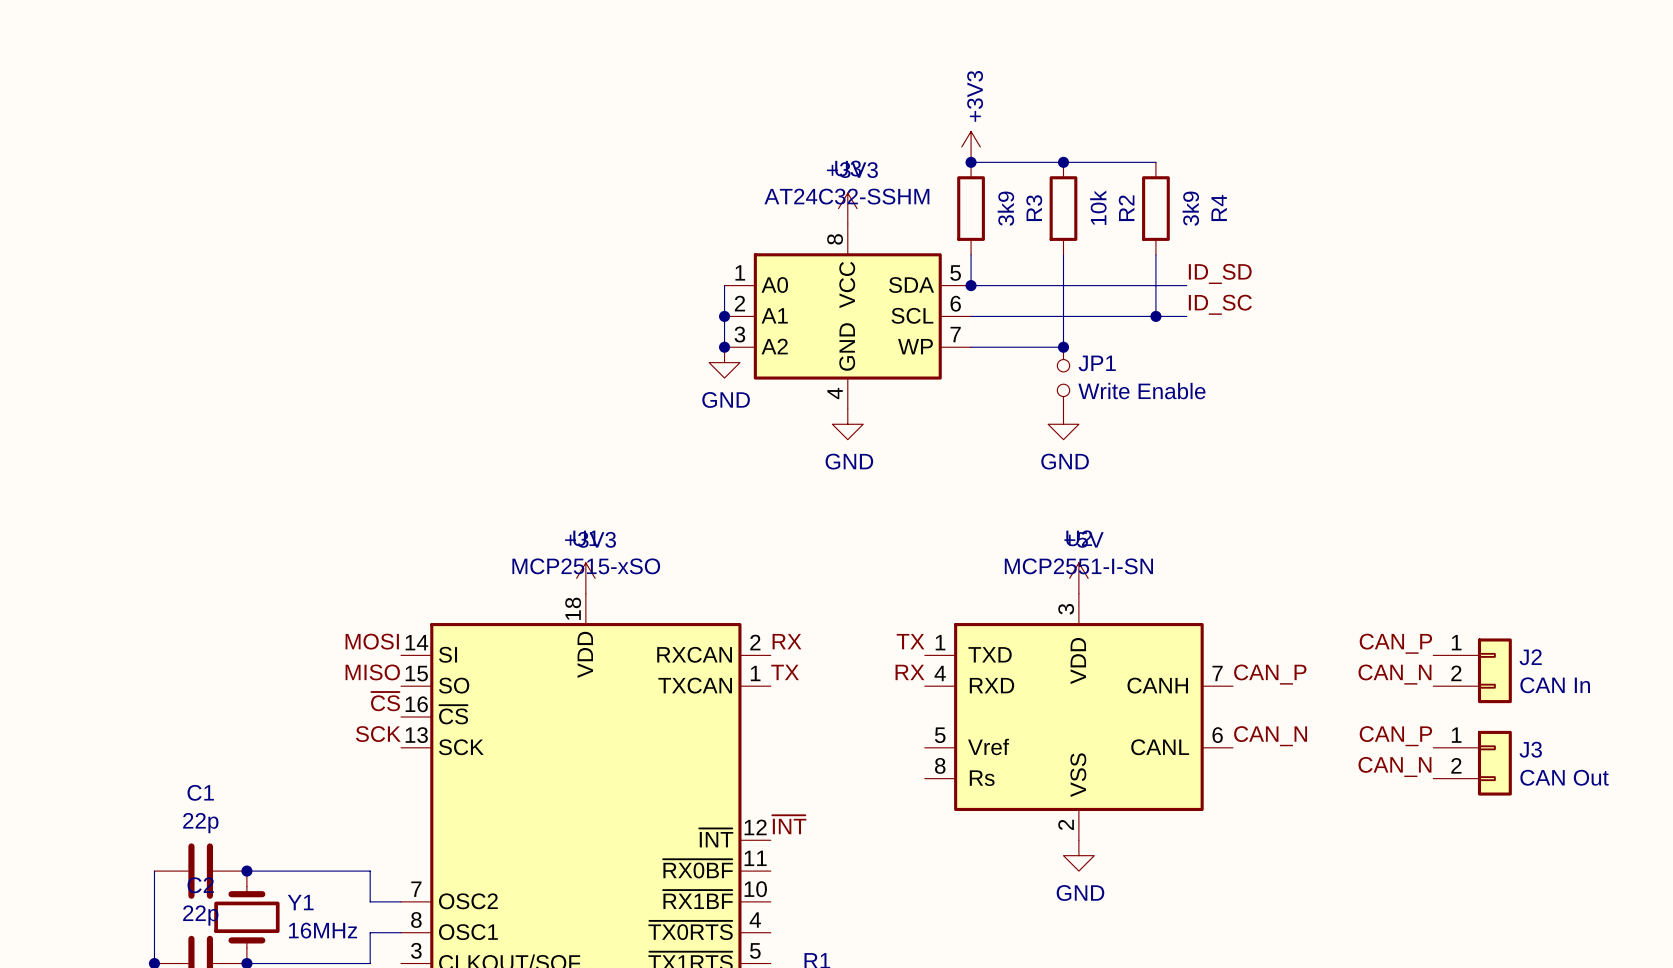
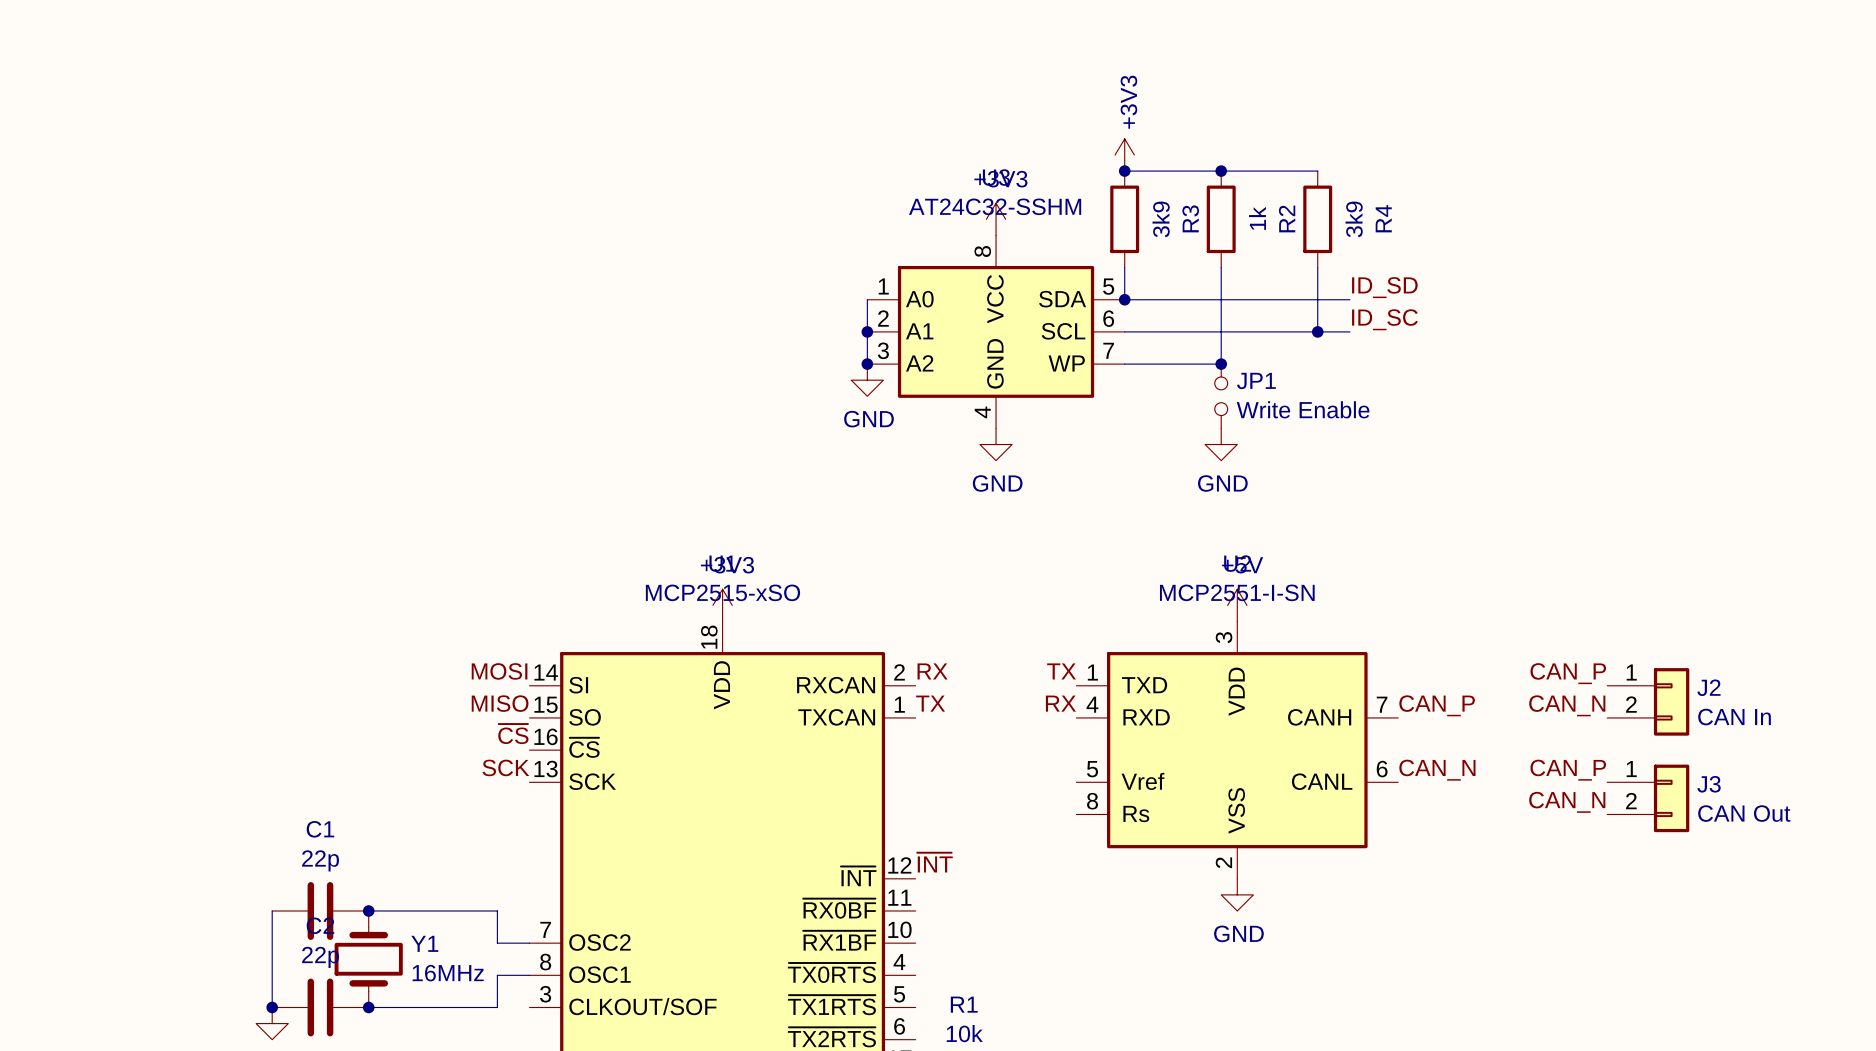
R2 value: 10k (1098, 207) -> 1k (1257, 218)

